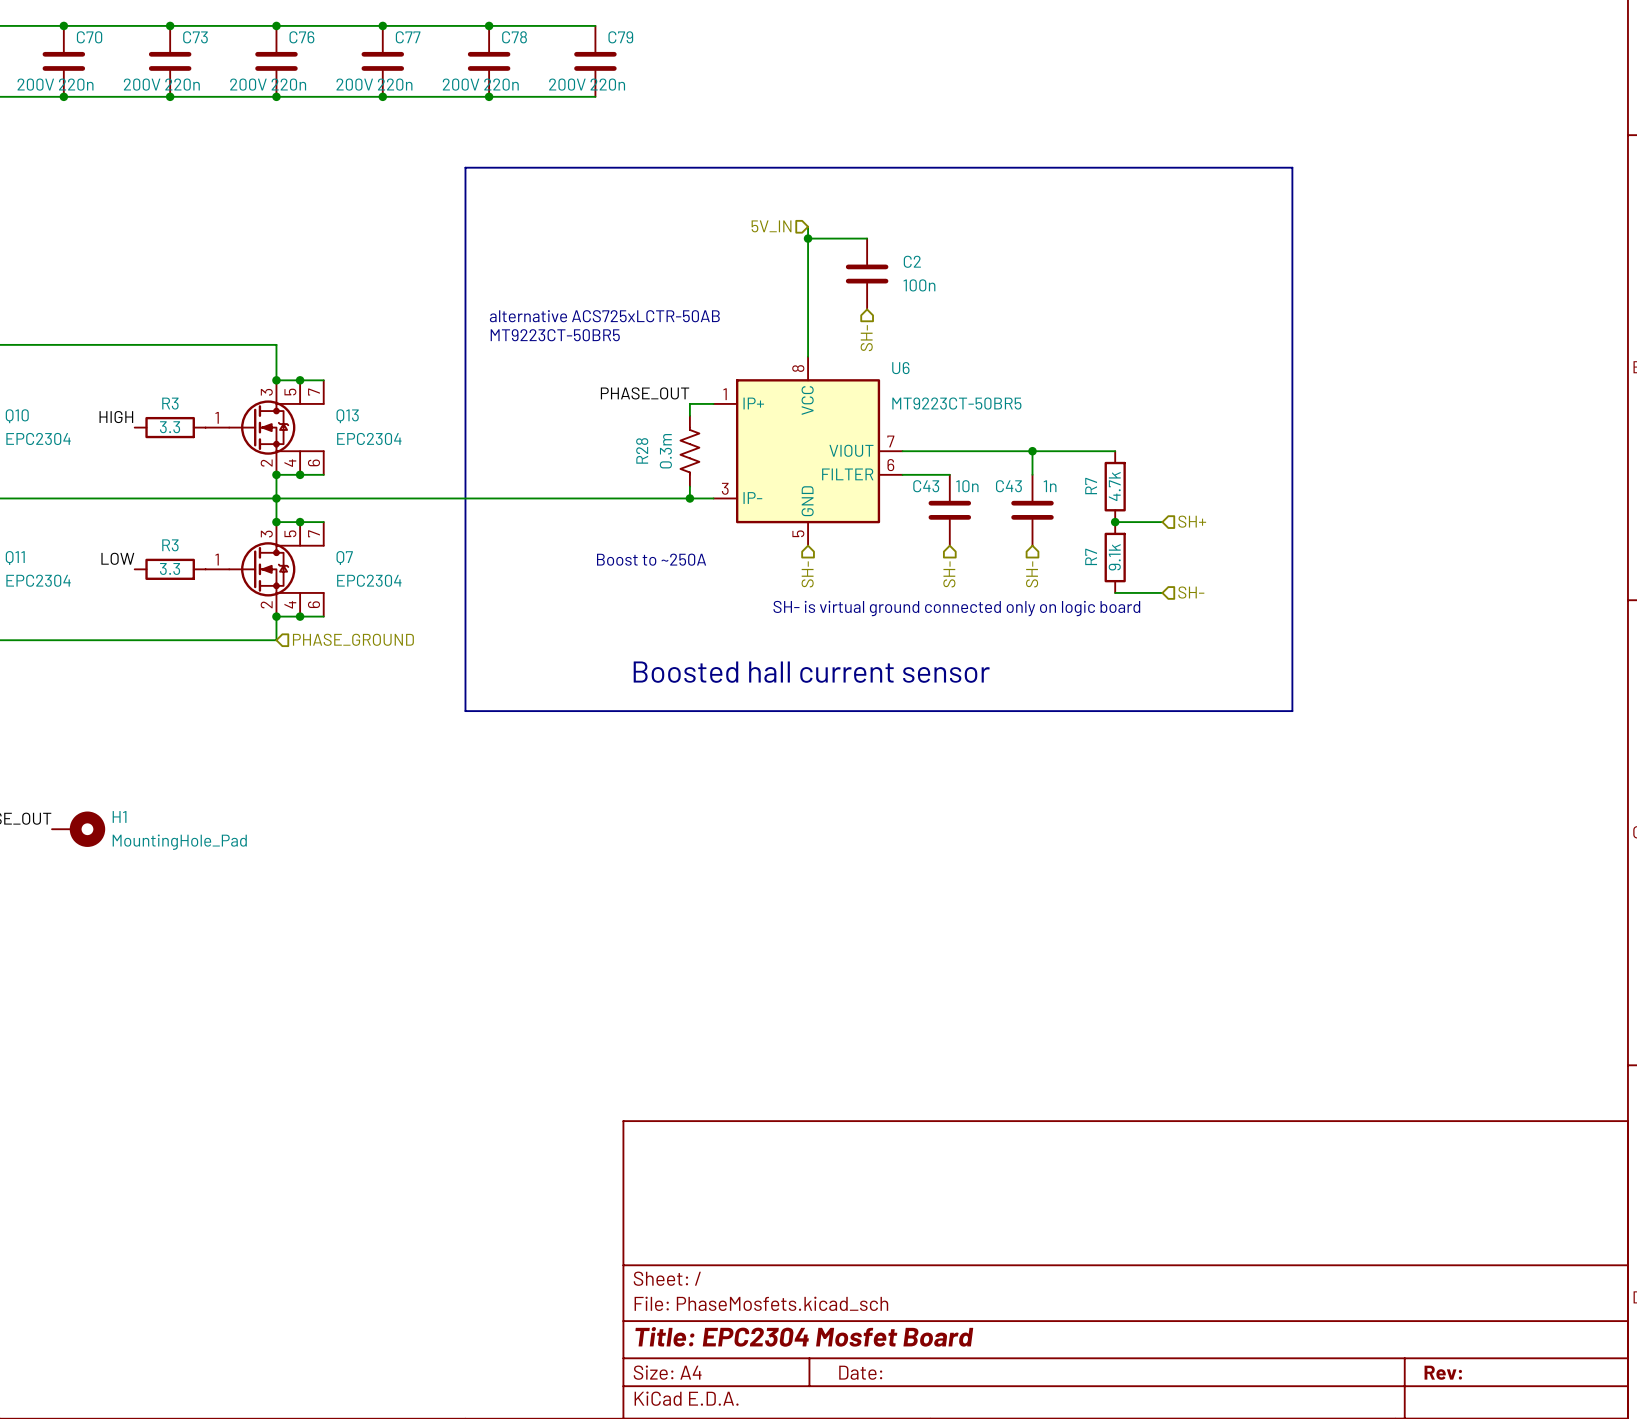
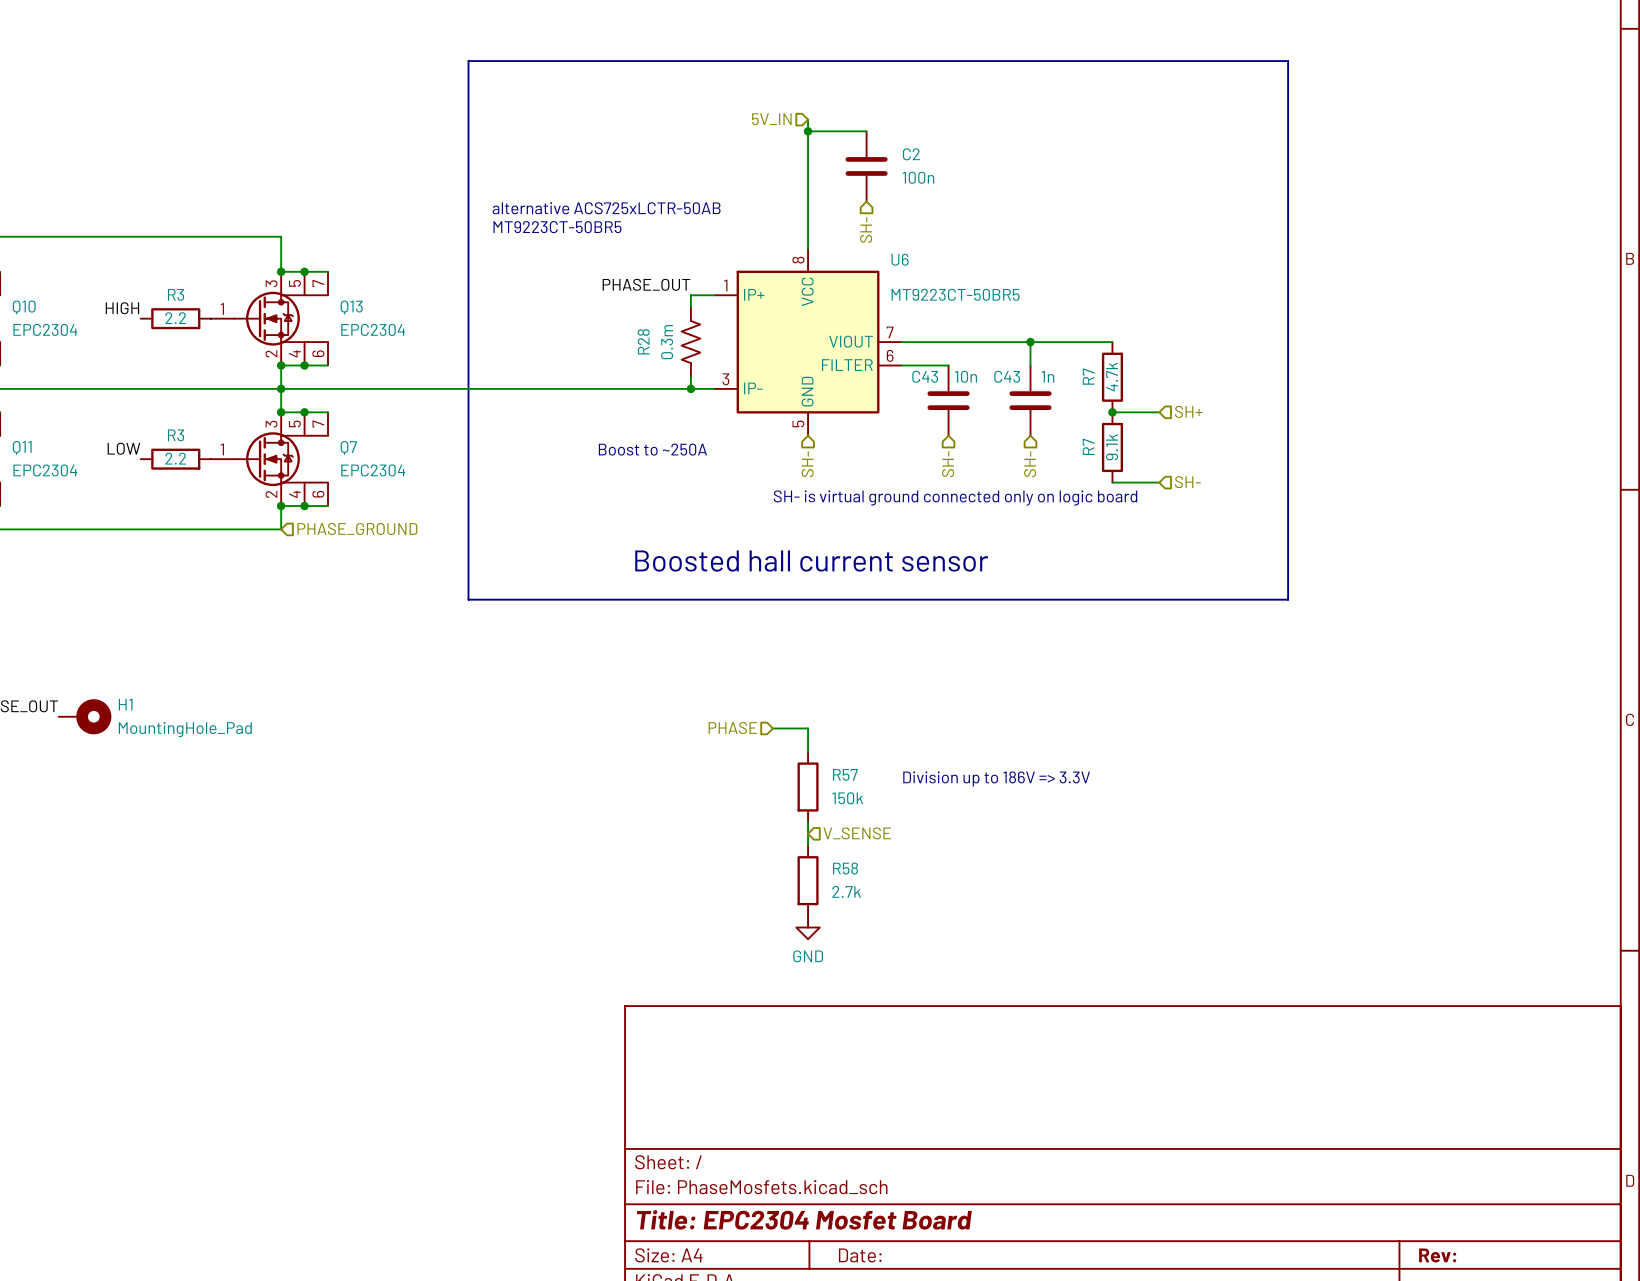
R3 value: 3.3 (170, 427) -> 2.2 (175, 318)
R3 value: 3.3 (170, 568) -> 2.2 (175, 458)
hierarchical label: none -> PHASE (732, 728)
wire: none -> (772, 728) (808, 728) (808, 751)
text: none -> Division up to 186V => 3.3V (996, 778)
R57: none -> 150k (808, 787)
wire: none -> (808, 822) (808, 845)
hierarchical label: none -> V_SENSE (857, 833)
R58: none -> 2.7k (808, 880)
power symbol: none -> GND (808, 927)

